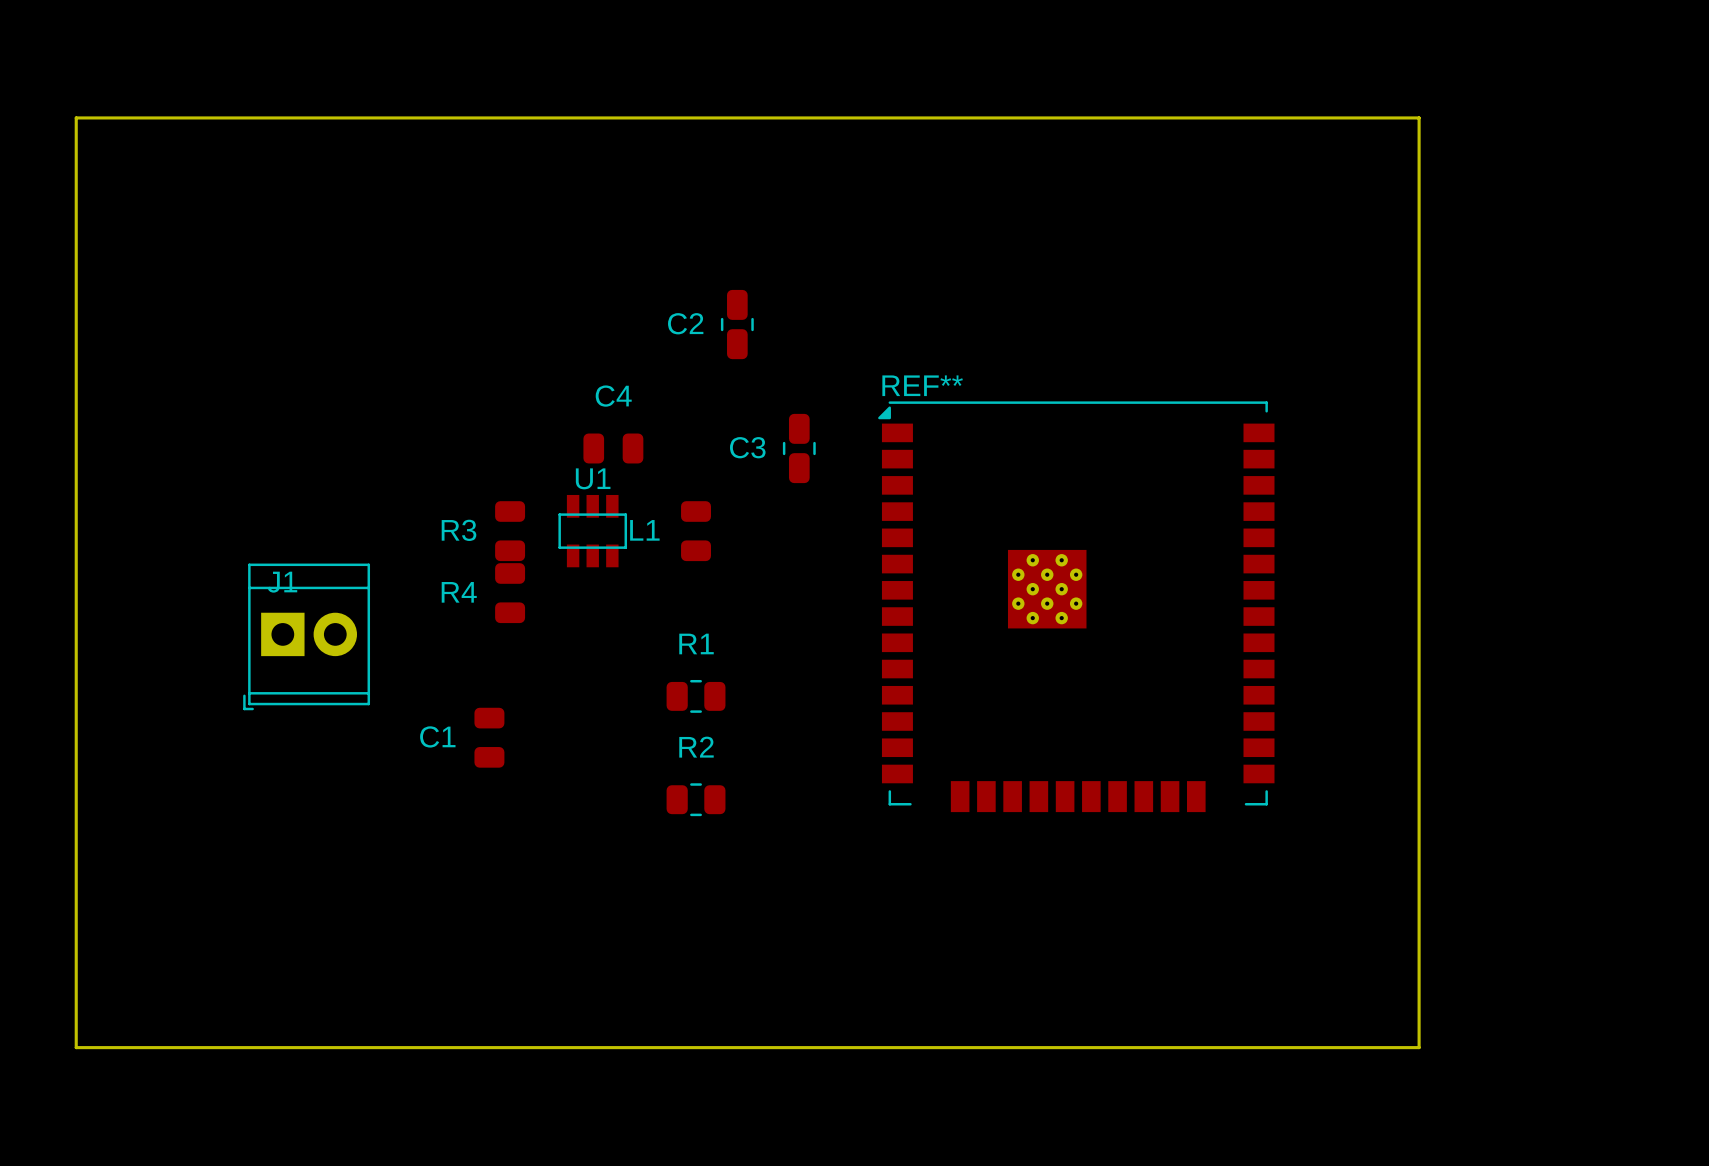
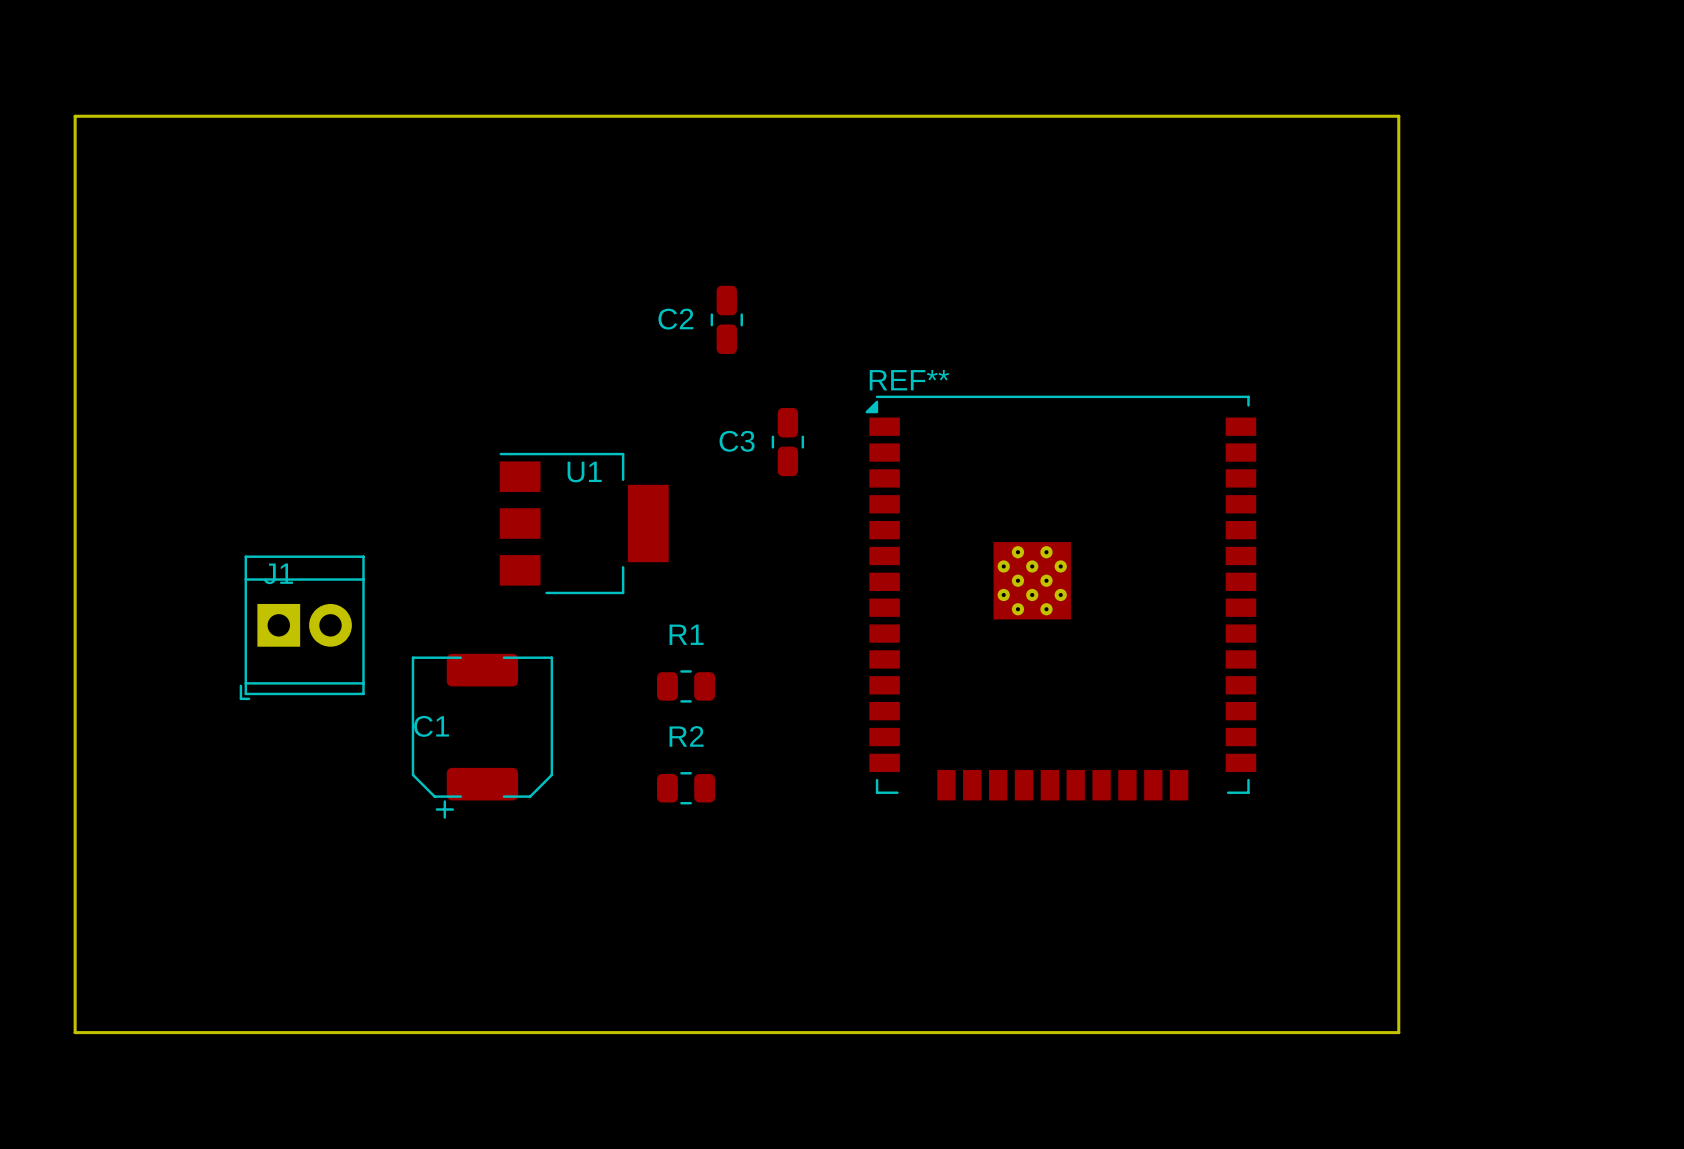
C4: (613, 448) -> none
U1 footprint: [558, 494, 628, 568] -> [499, 452, 669, 595]
R3: (510, 531) -> none
L1: (696, 531) -> none
R4: (510, 593) -> none
C1 footprint: [474, 707, 505, 768] -> [411, 653, 554, 819]

